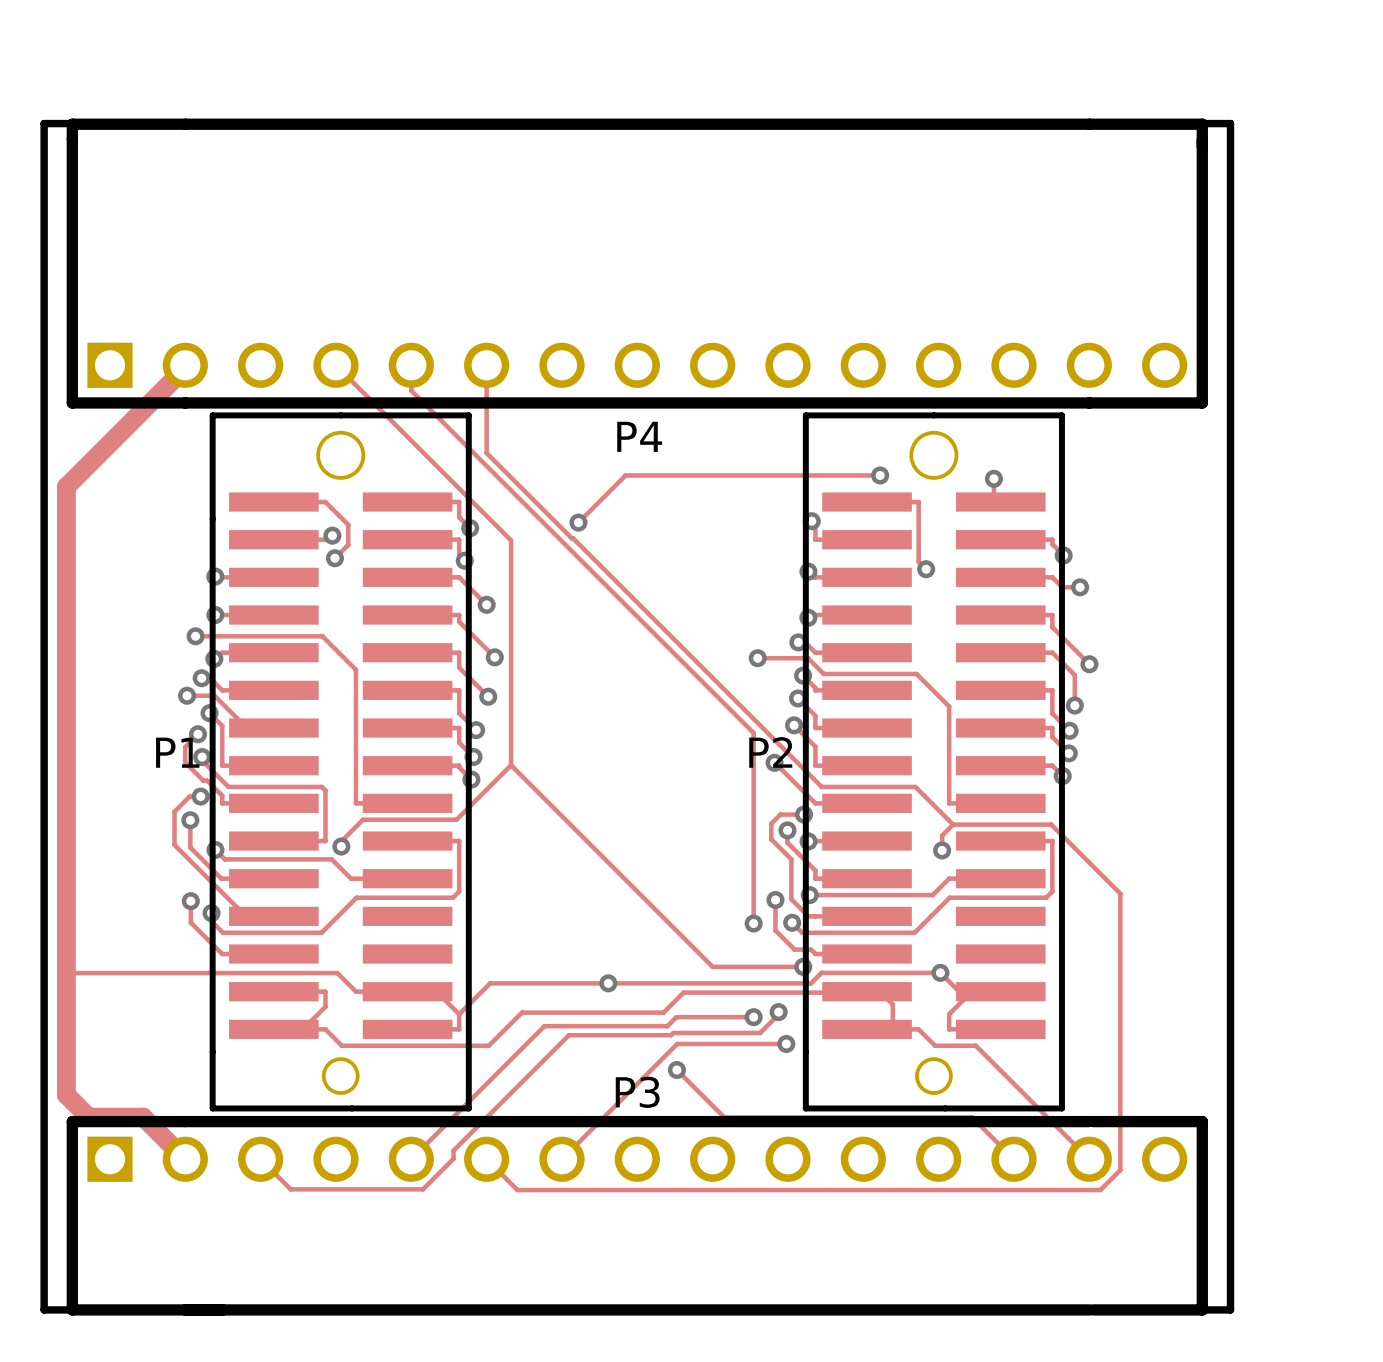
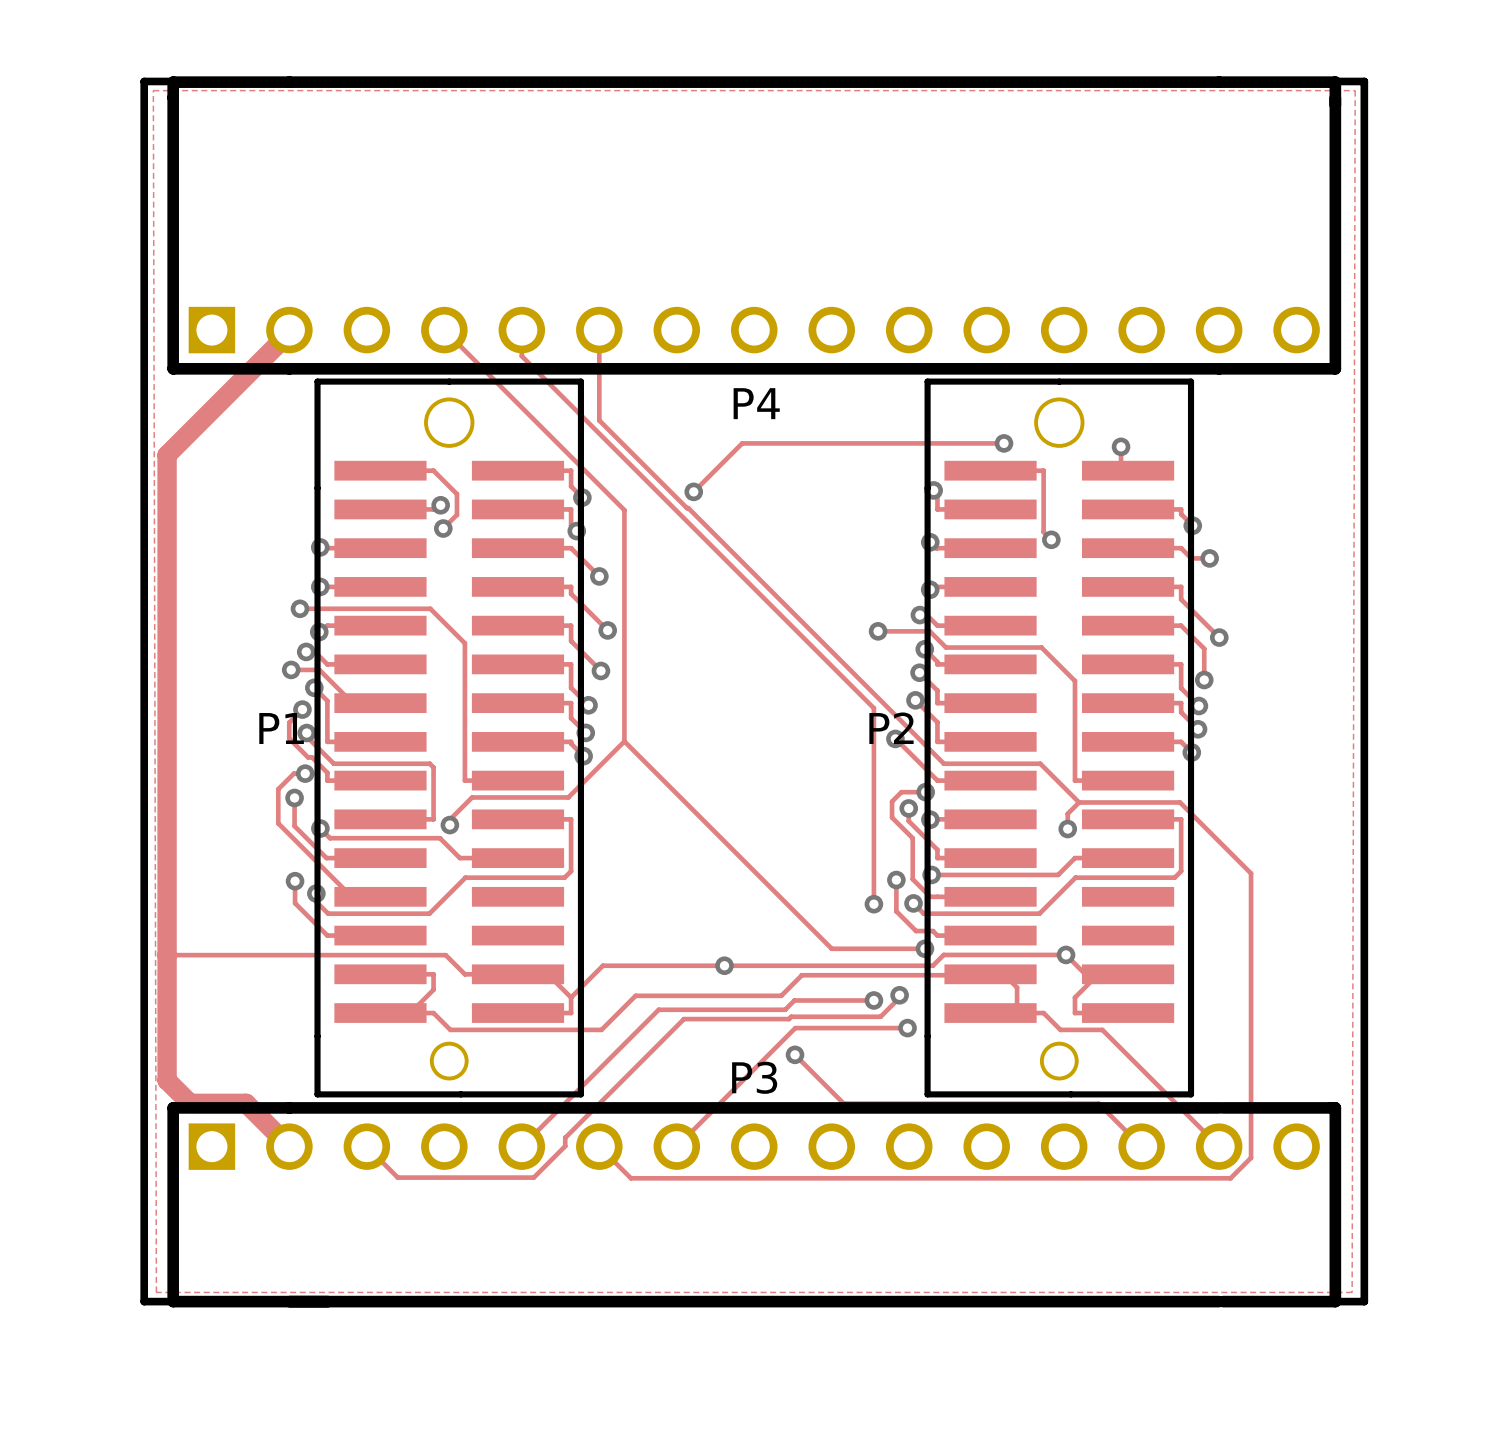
zone outline: none -> (153, 90) (156, 1292) (1352, 1292) (1355, 90) (153, 90)

